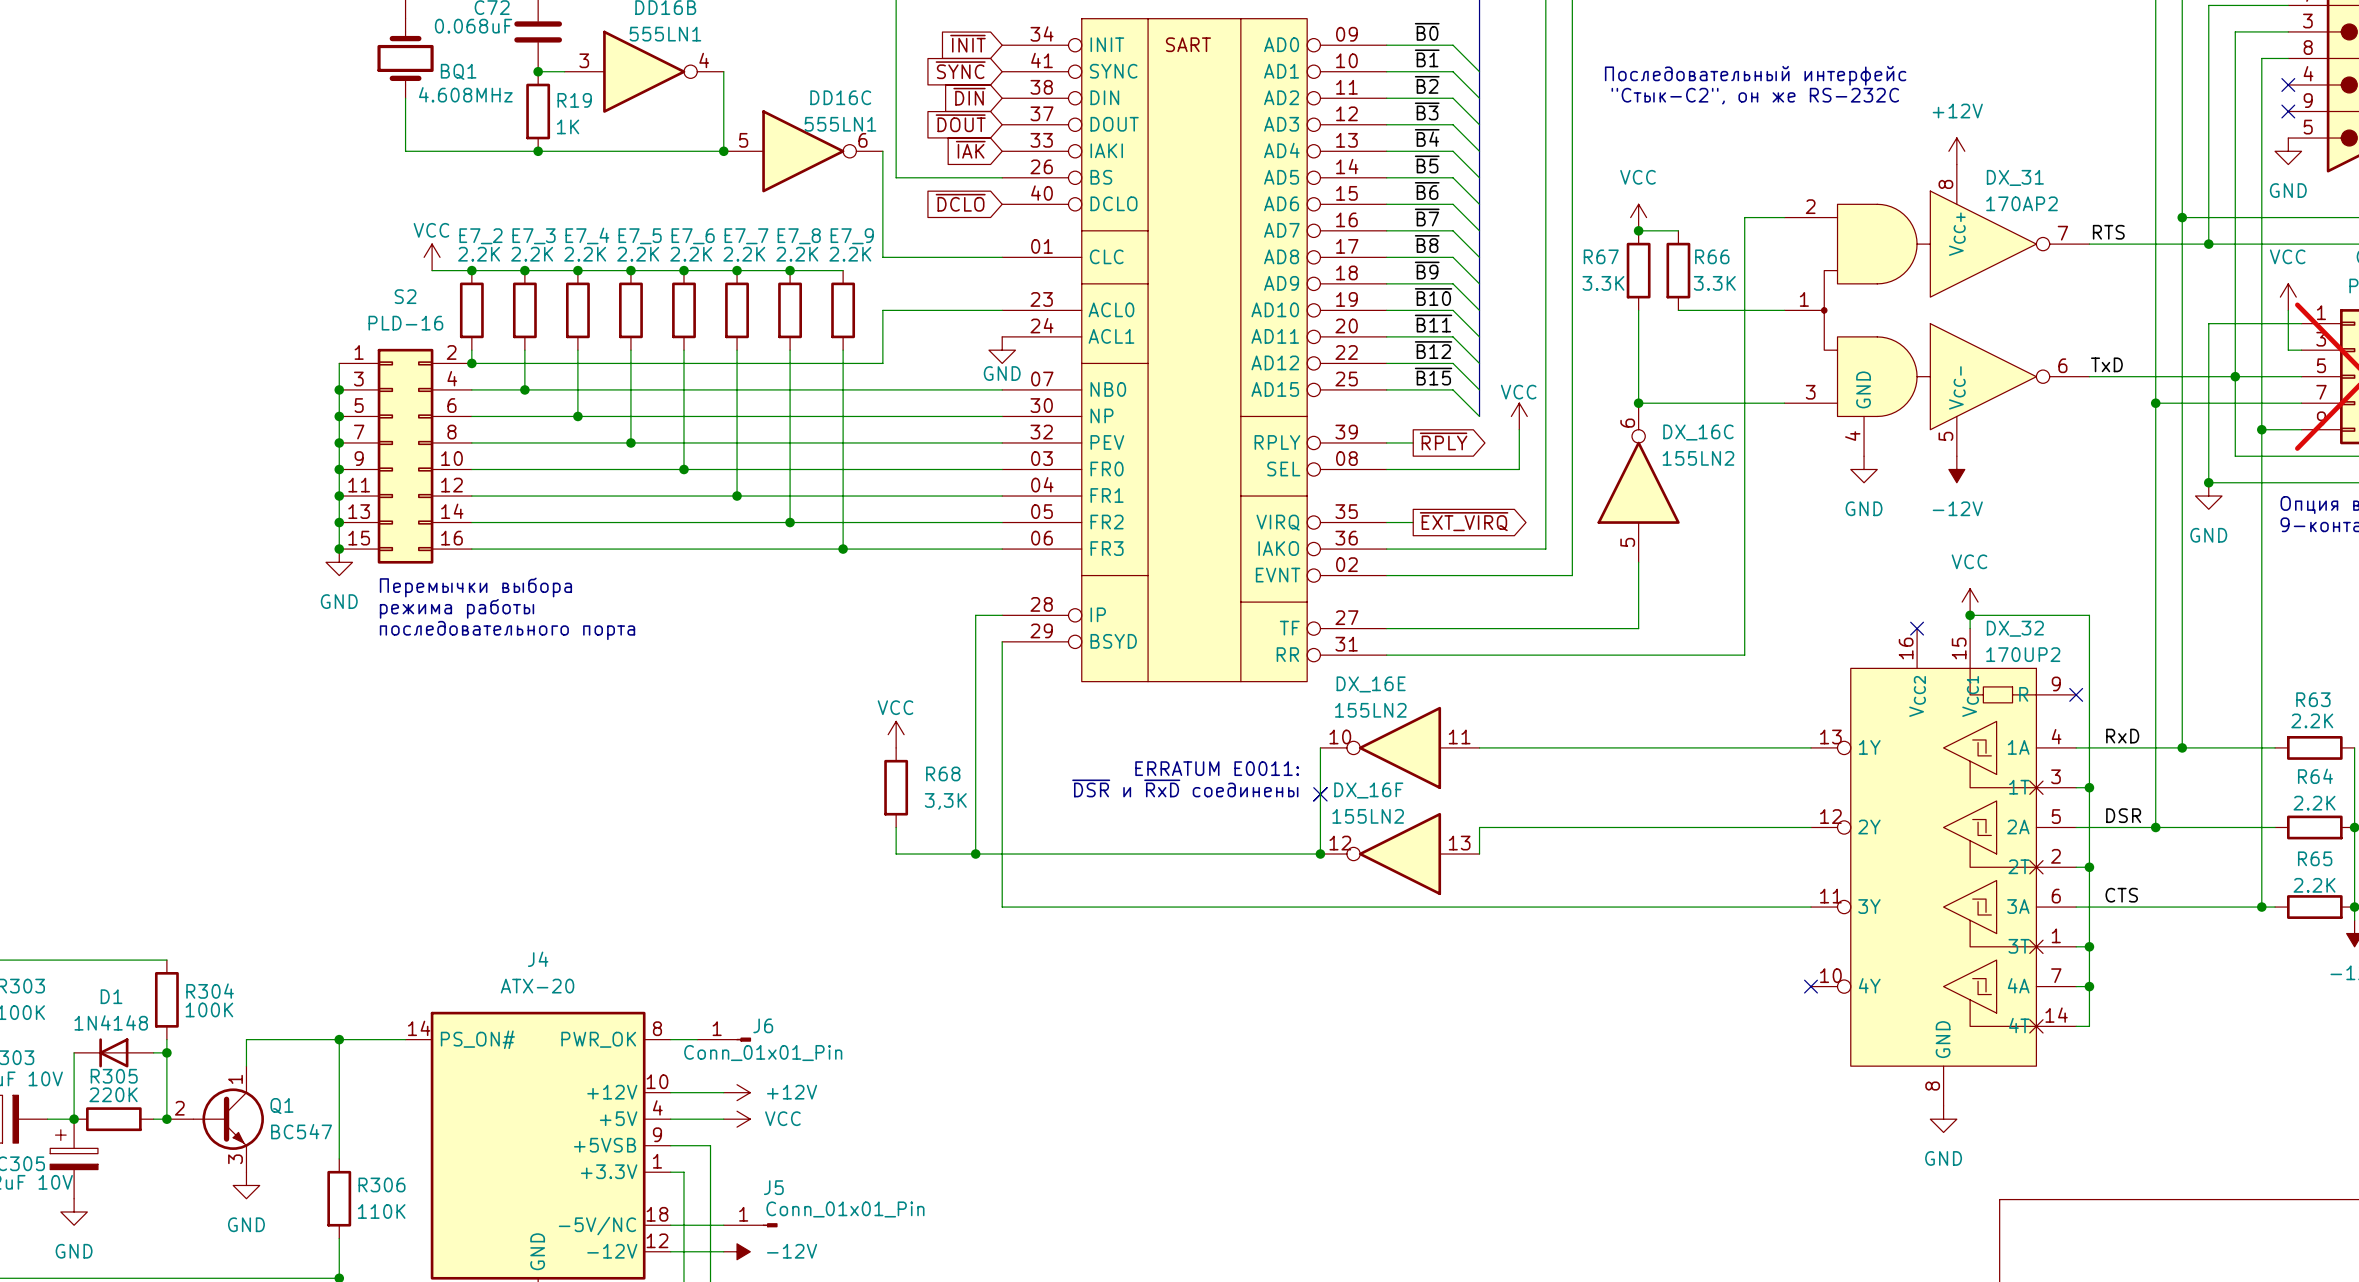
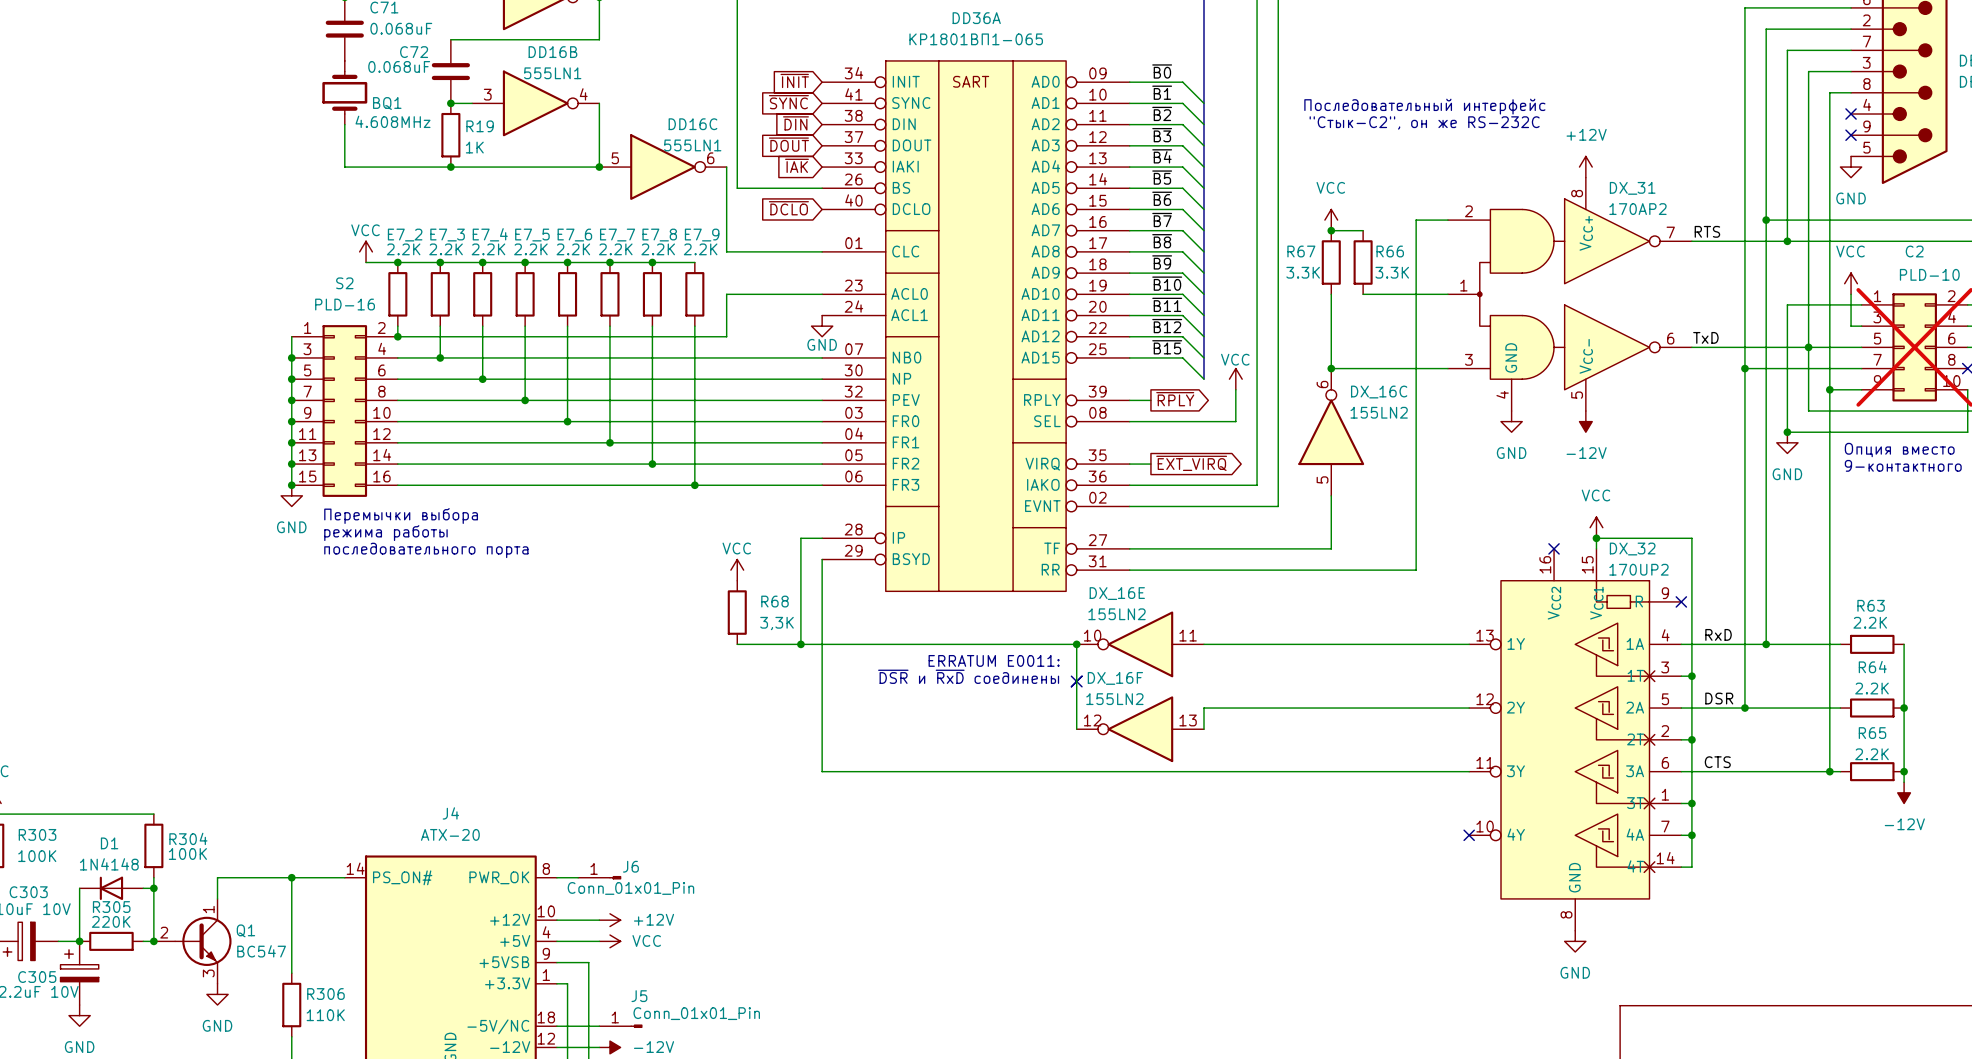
power symbol position: VCC (896, 734) -> VCC (737, 570)
wire: none -> (737, 644) (1076, 644)
wire: (975, 747) (975, 854) -> none
junction: none -> (800, 644)
junction: none -> (1076, 644)
R68 position: (896, 787) -> (737, 612)
wire: (896, 827) (896, 854) (1320, 854) -> none
junction: (975, 854) -> none
junction: (1320, 854) -> none

